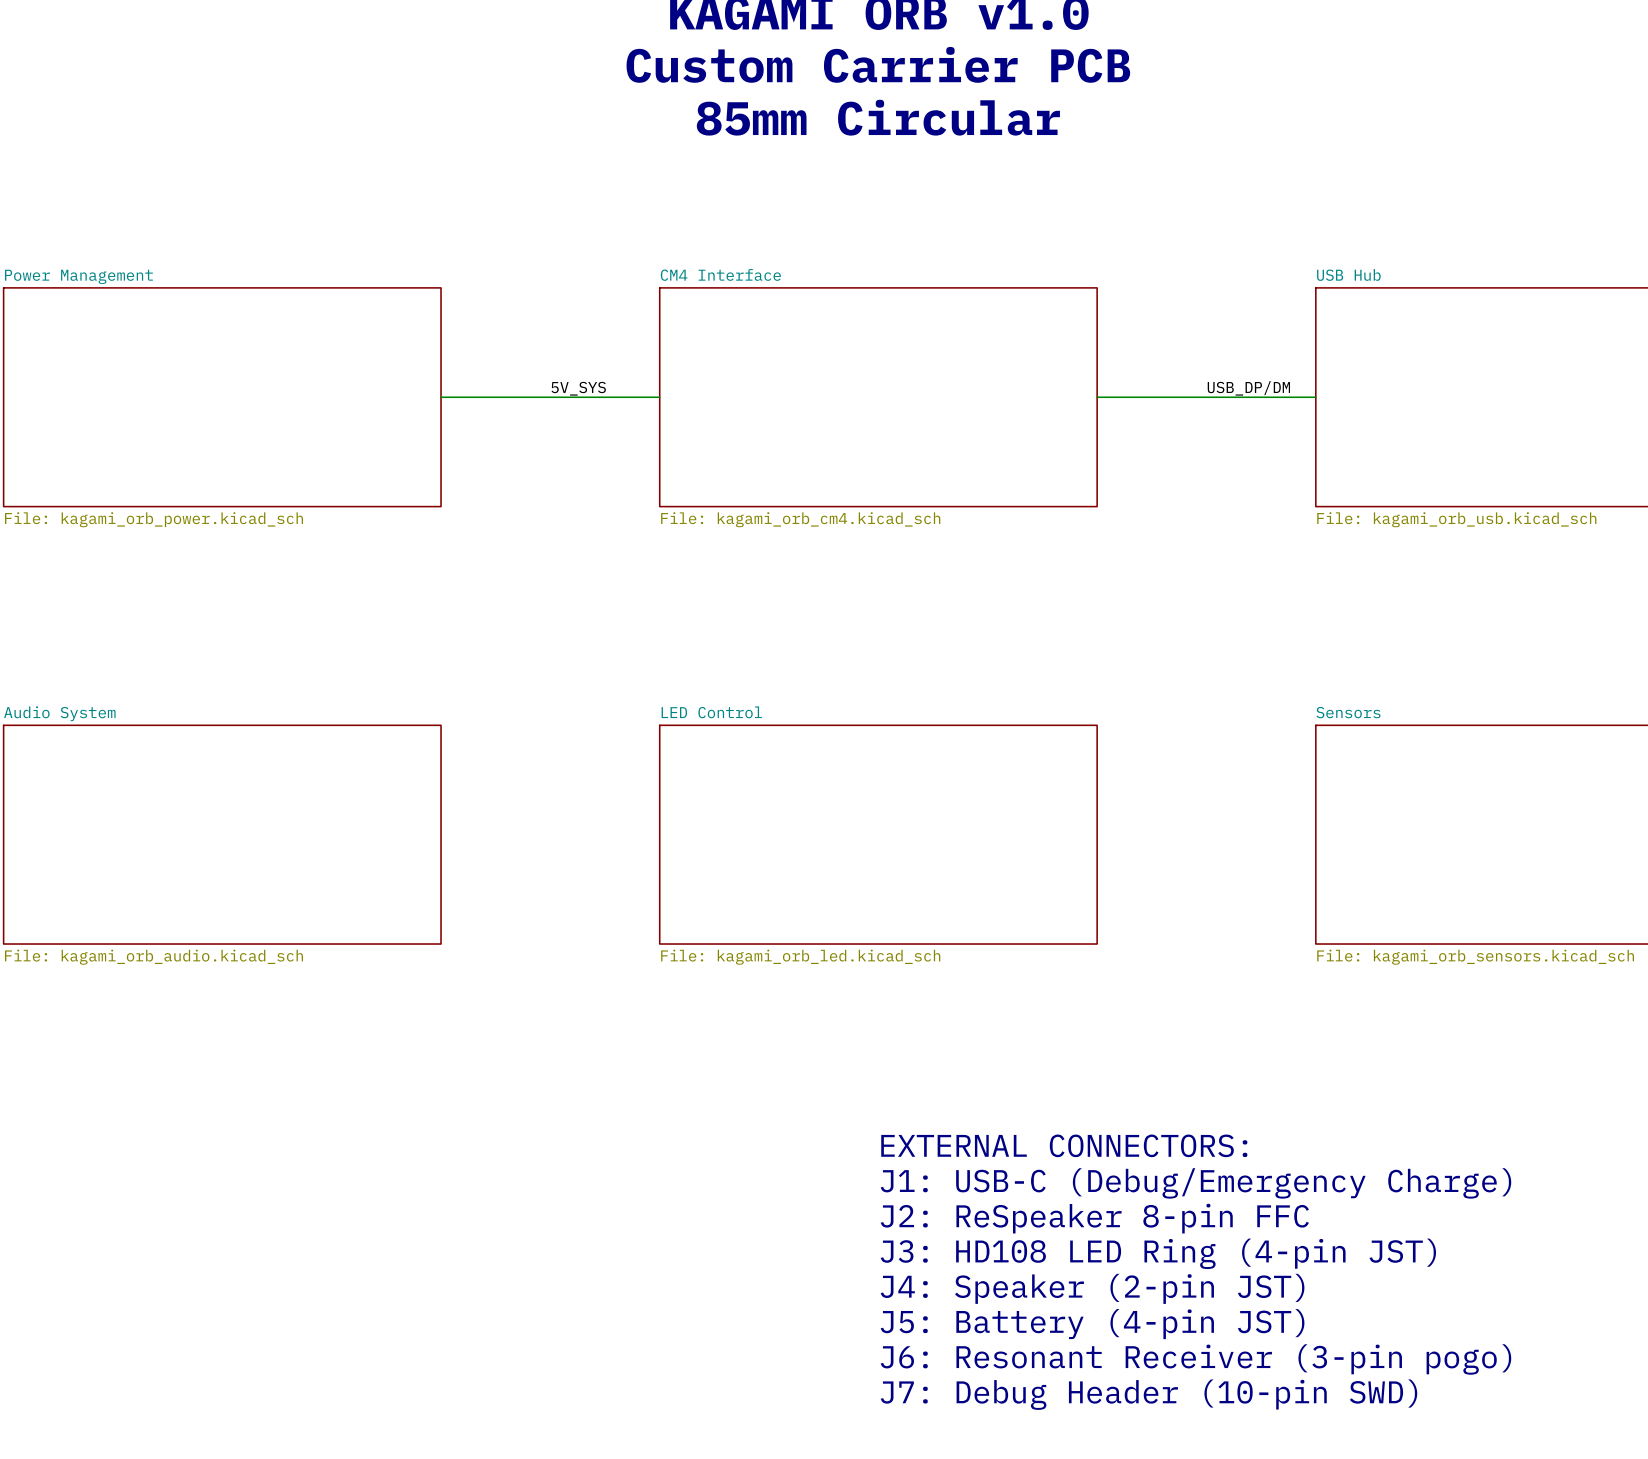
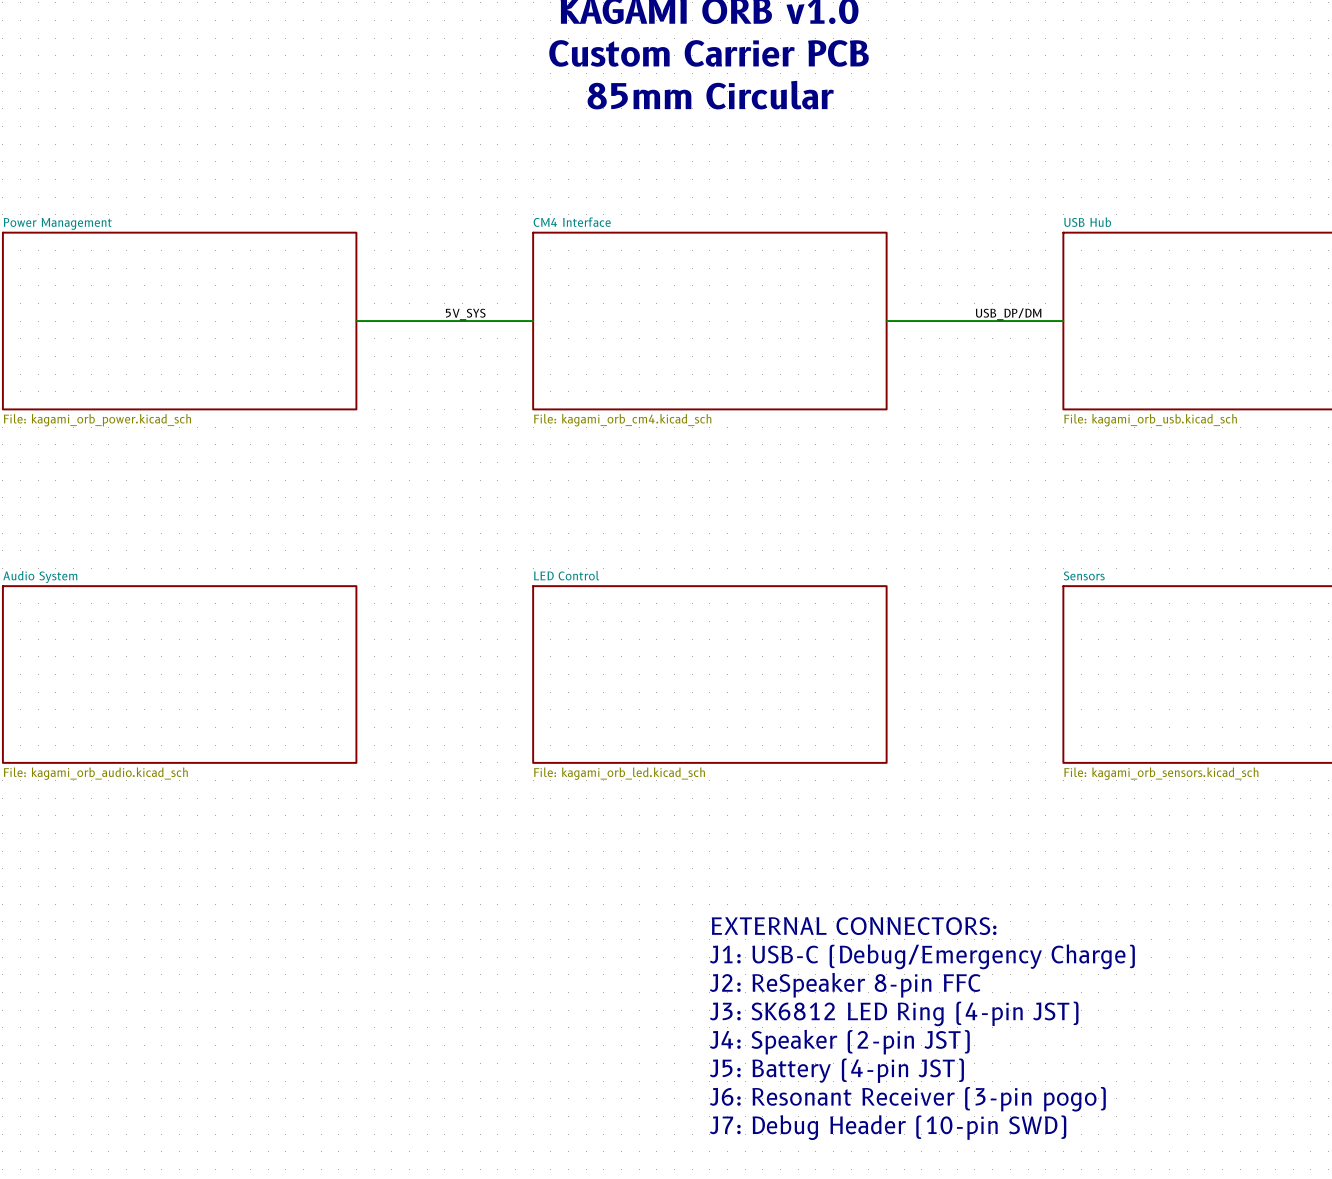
text: J3: HD108 LED Ring (4-pin JST) (1158, 1253) -> J3: SK6812 LED Ring (4-pin JST) (894, 1013)

